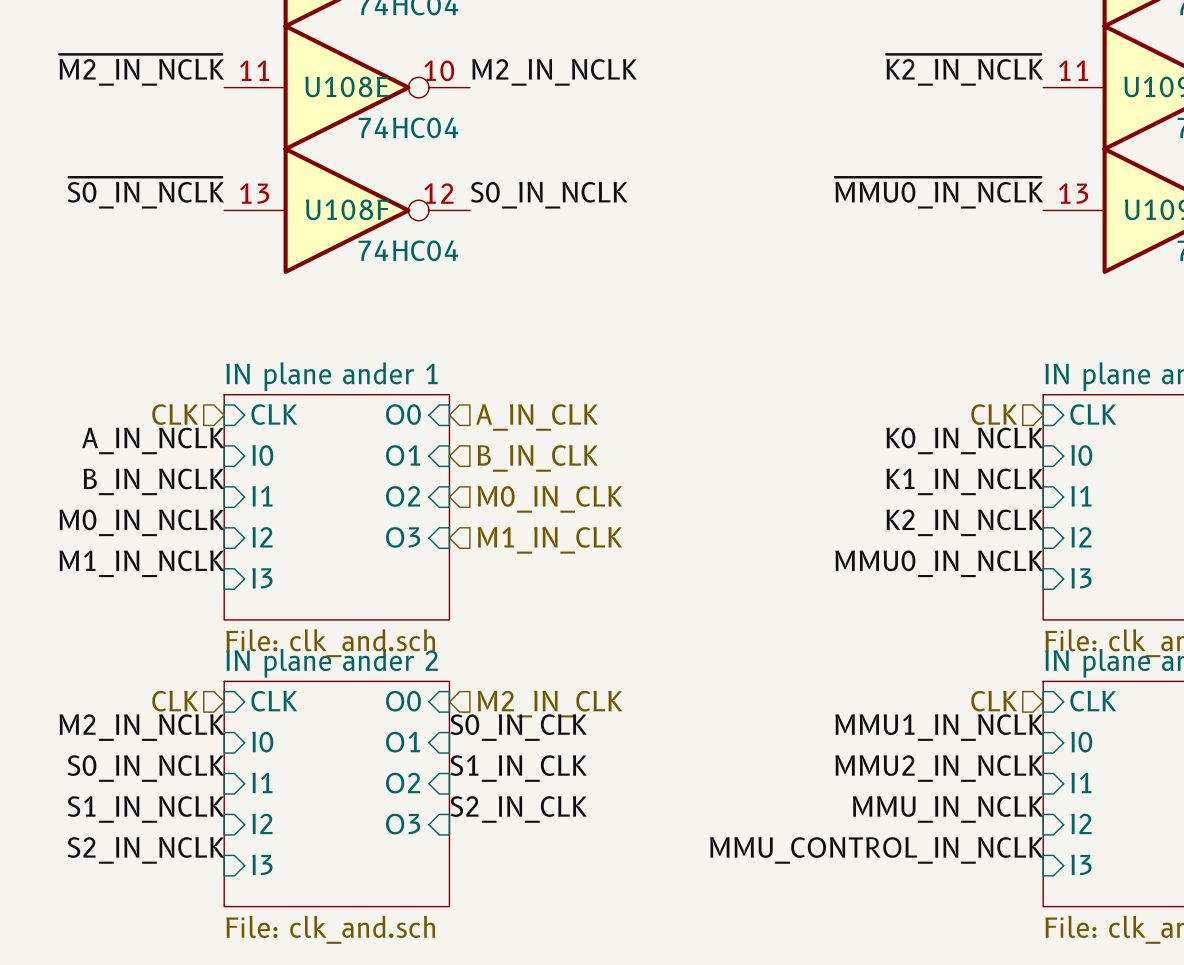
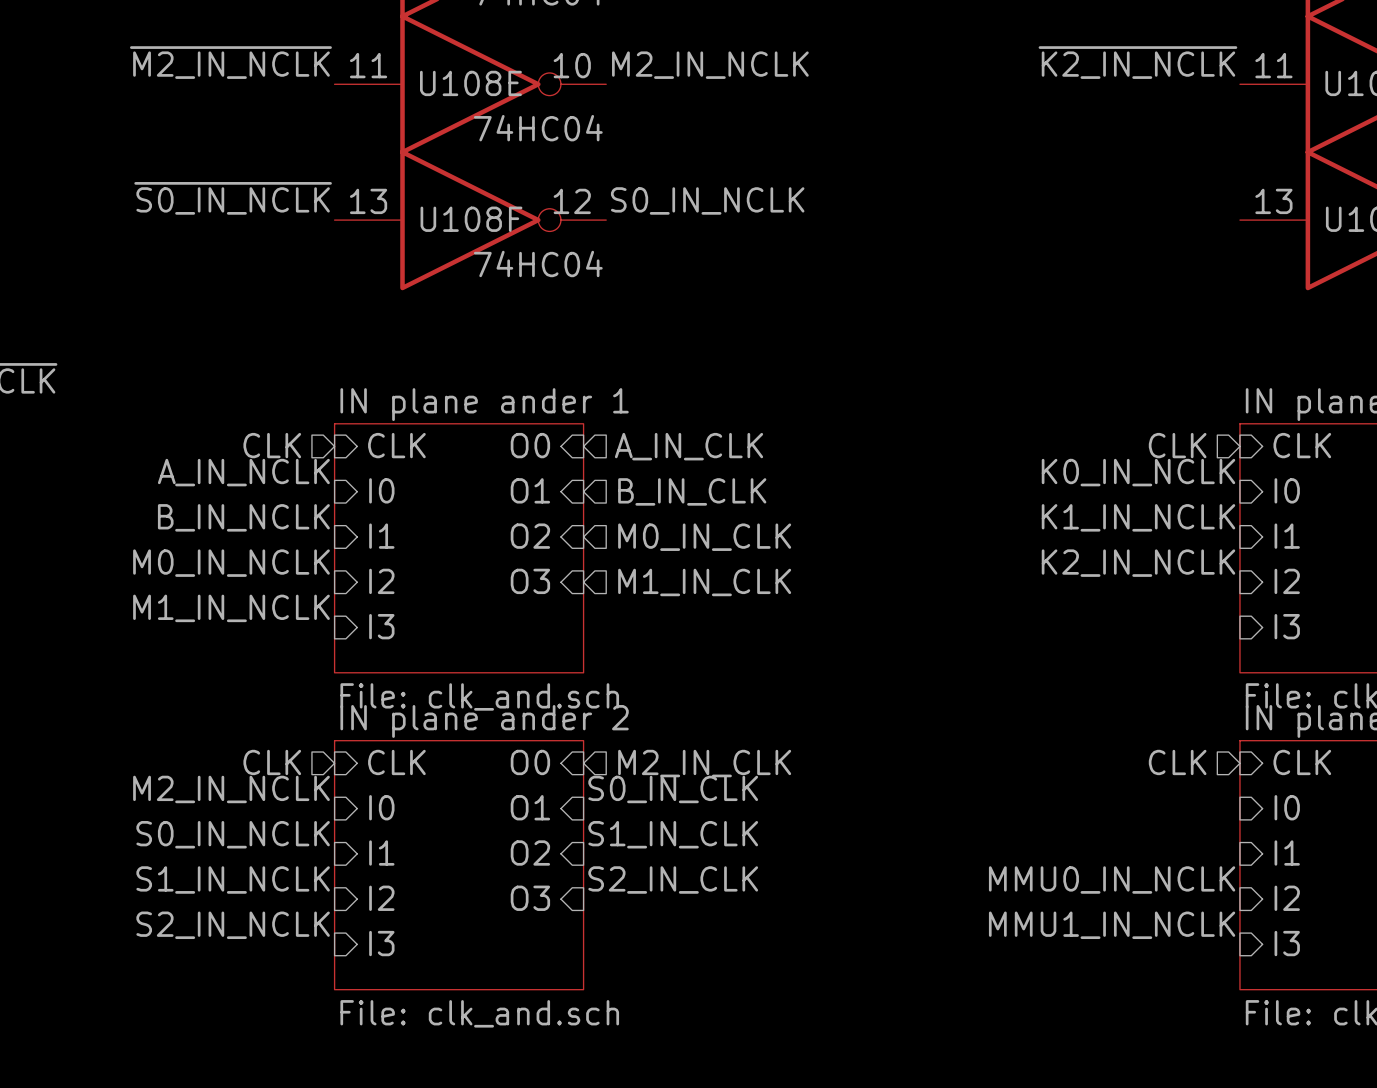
label: ~{MMU0_IN_NCLK} (939, 192) -> none
label: MMU0_IN_NCLK (939, 563) -> none
label: MMU1_IN_NCLK (939, 727) -> none
label: MMU2_IN_NCLK (939, 768) -> none
label: MMU_IN_NCLK (947, 809) -> MMU0_IN_NCLK (1112, 880)
label: MMU_CONTROL_IN_NCLK (876, 850) -> MMU1_IN_NCLK (1112, 925)

